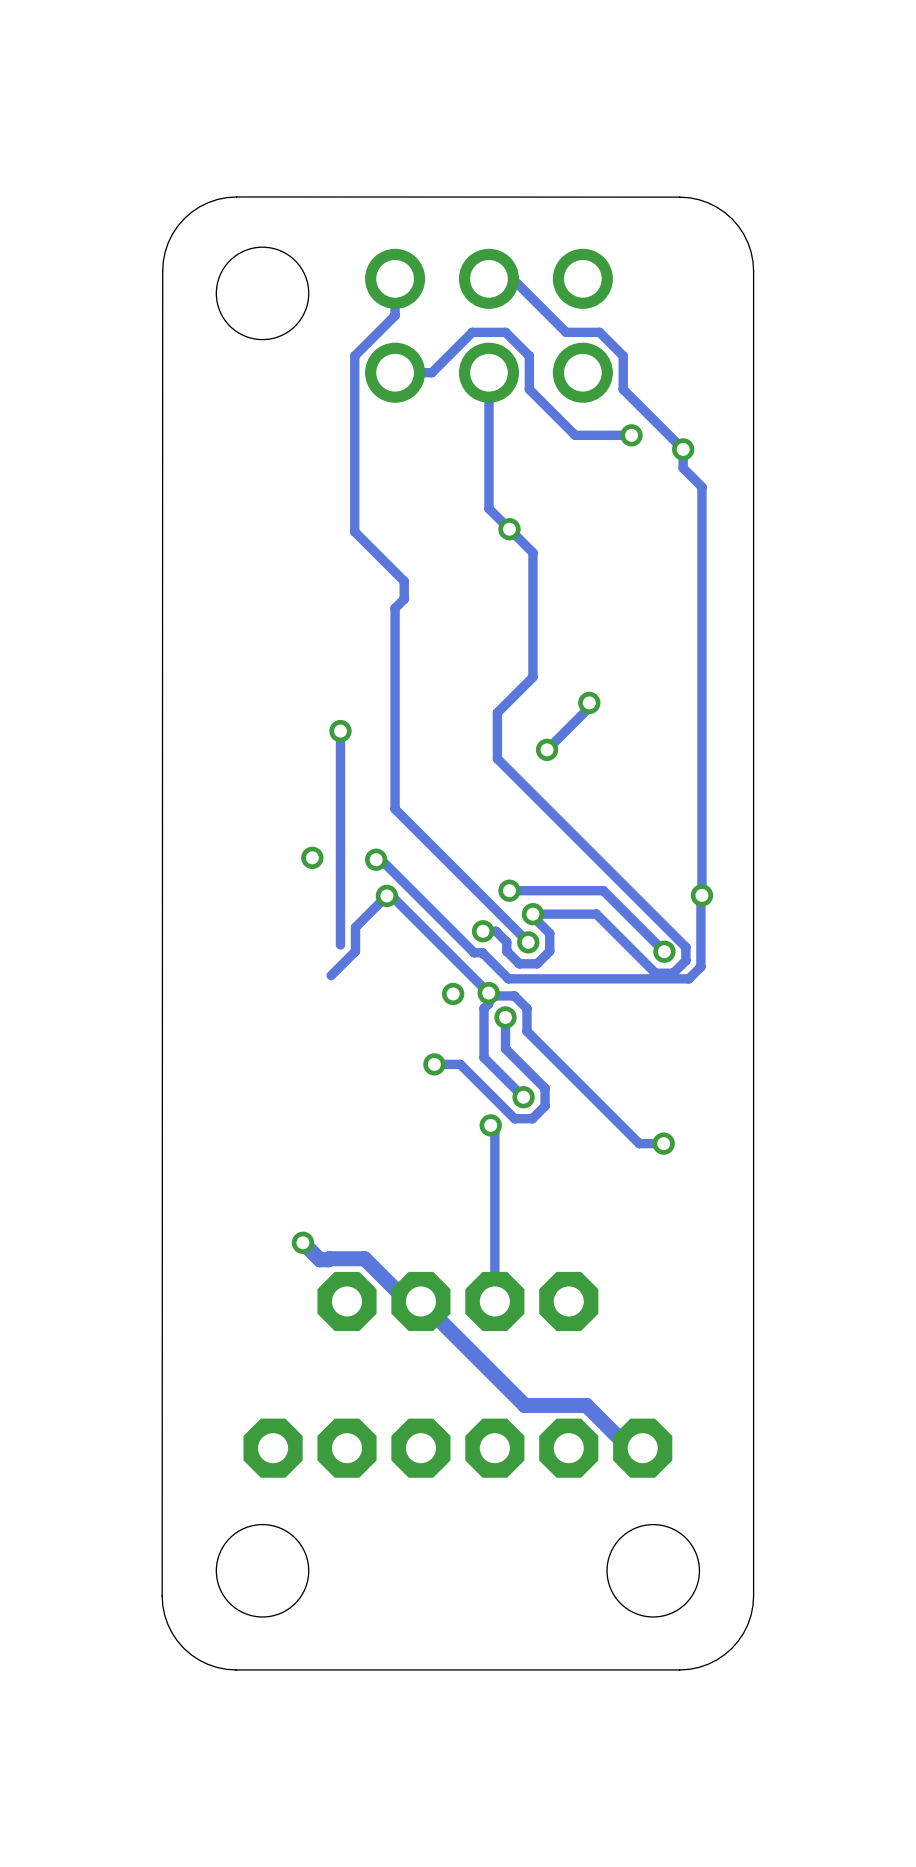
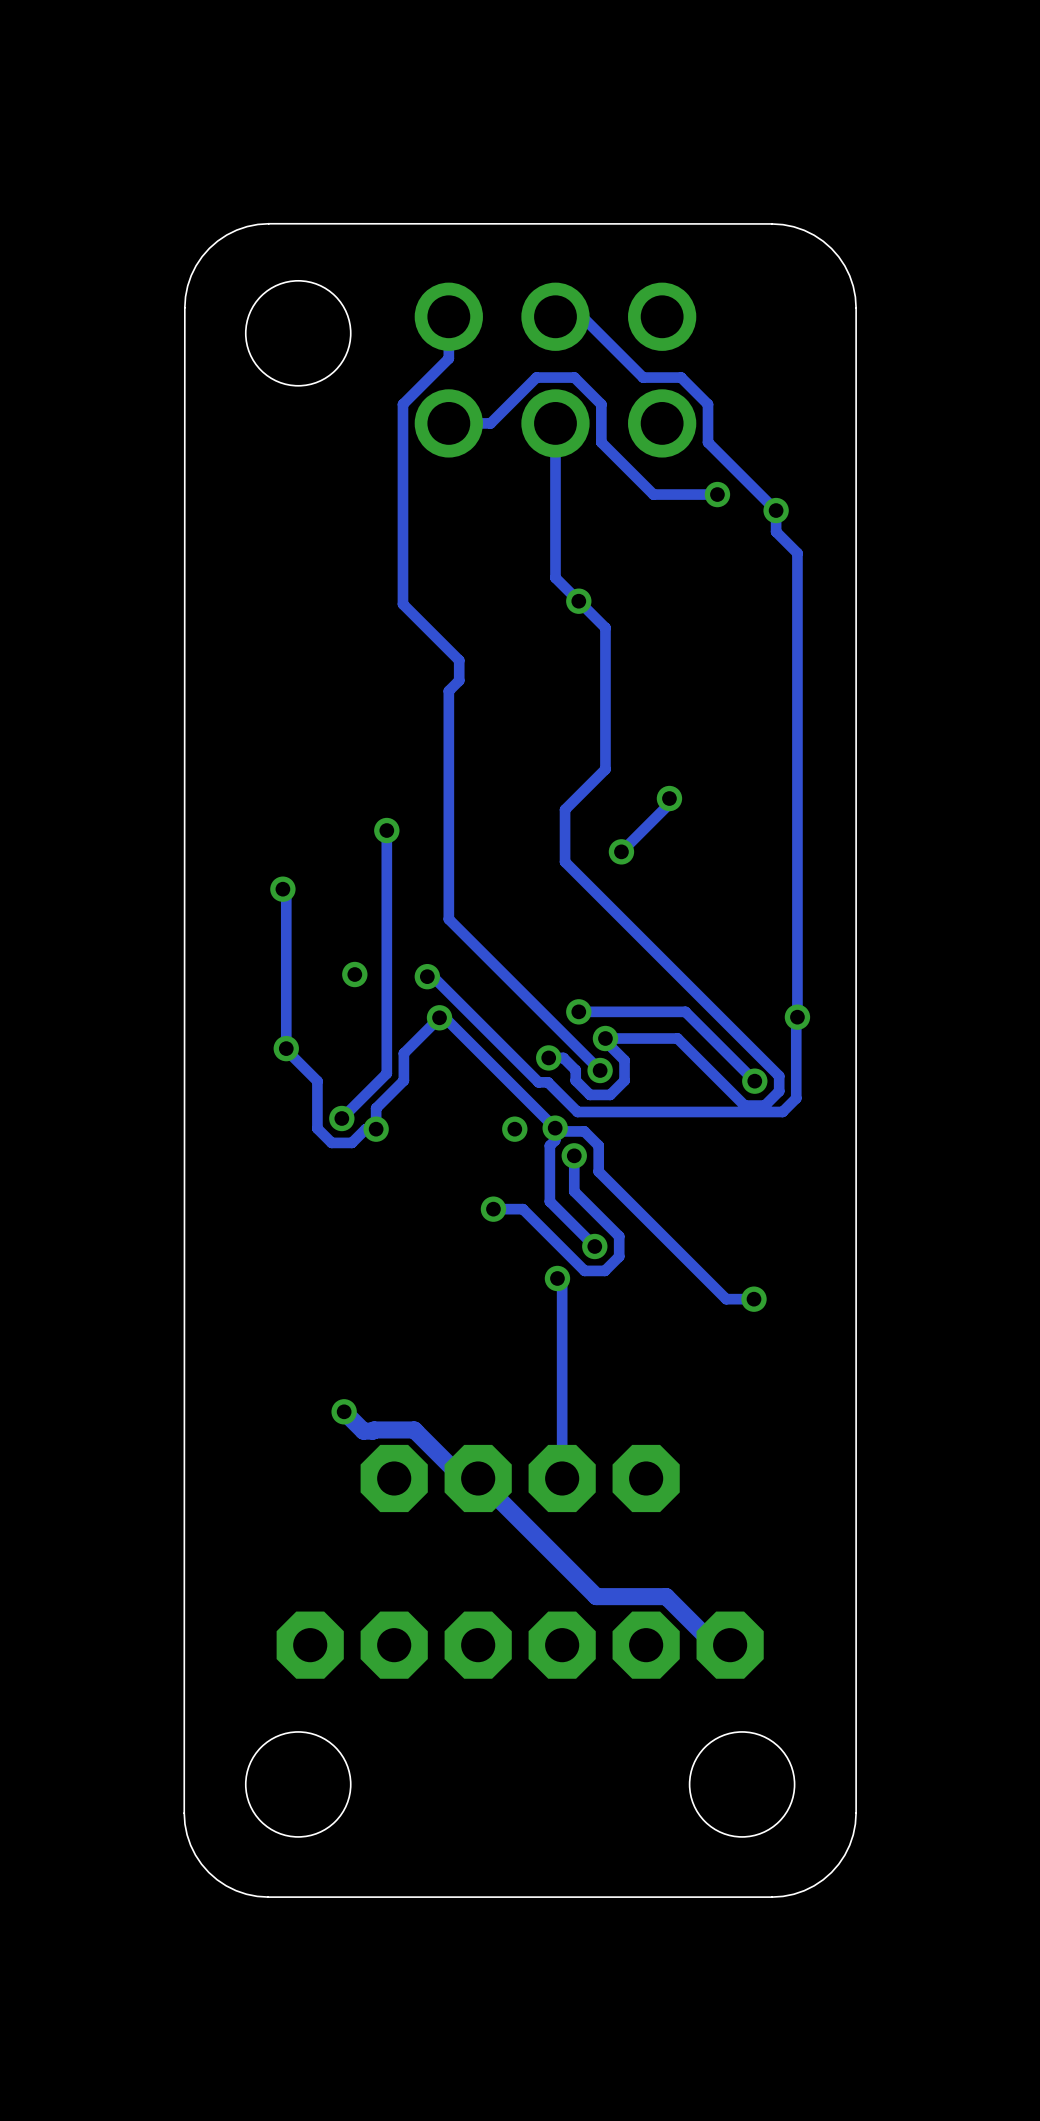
track: none -> (282, 889) (286, 892) (286, 1050) (317, 1081) (317, 1128) (331, 1142) (351, 1142) (365, 1129) (376, 1129) (376, 1108)
via: none -> (282, 889)
via: none -> (286, 1048)
track: none -> (386, 1073) (341, 1118)
via: none -> (341, 1118)
via: none -> (376, 1129)

